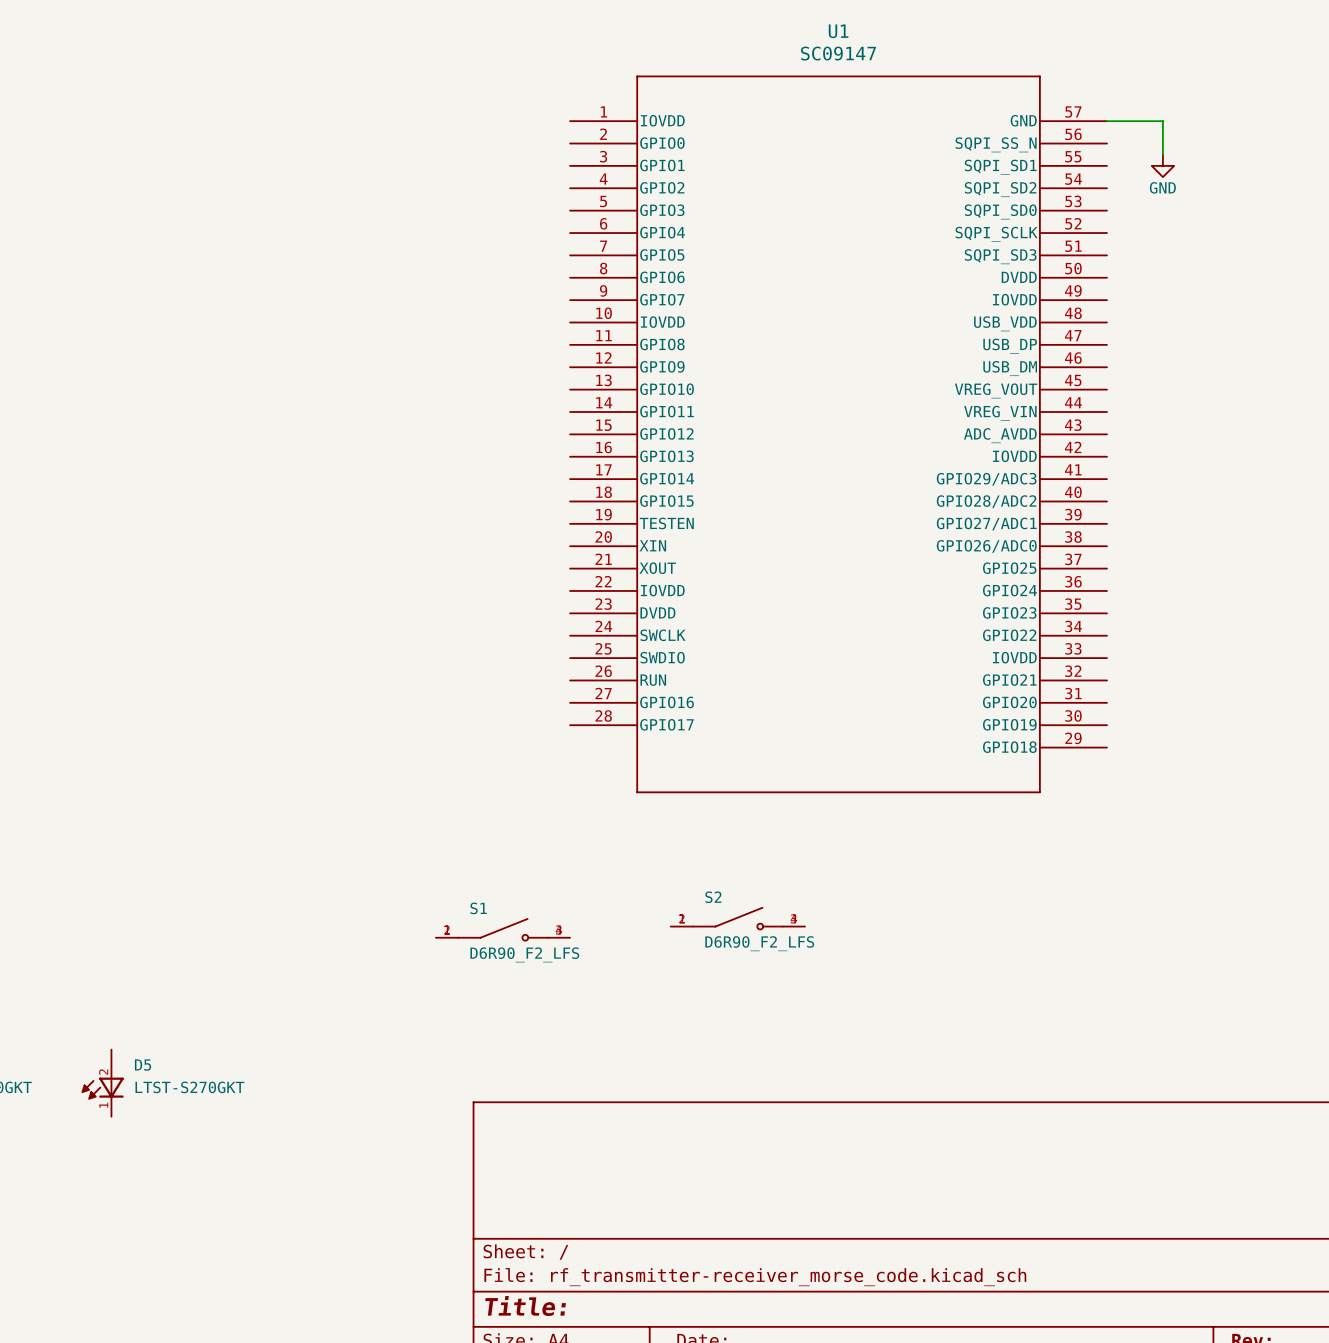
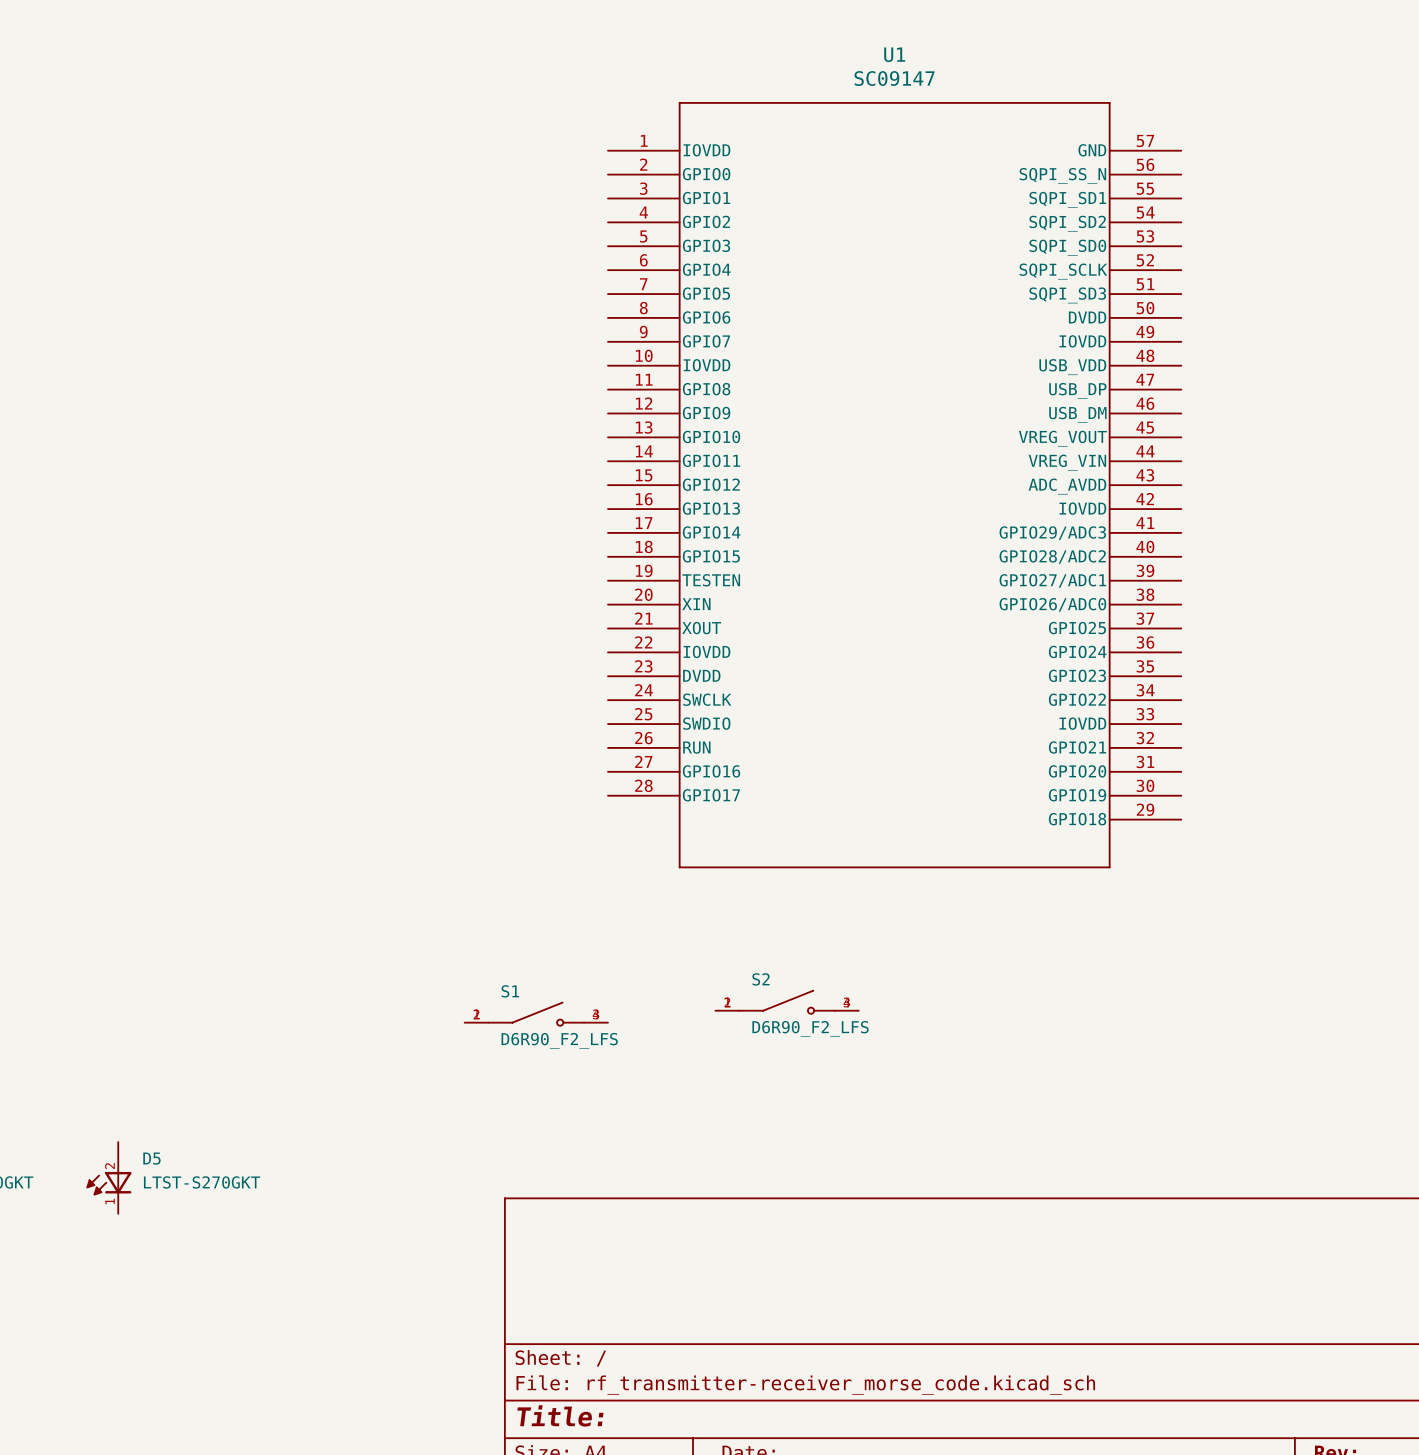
wire: (1107, 121) (1162, 121) (1162, 154) -> none
power symbol: GND (1162, 165) -> none

